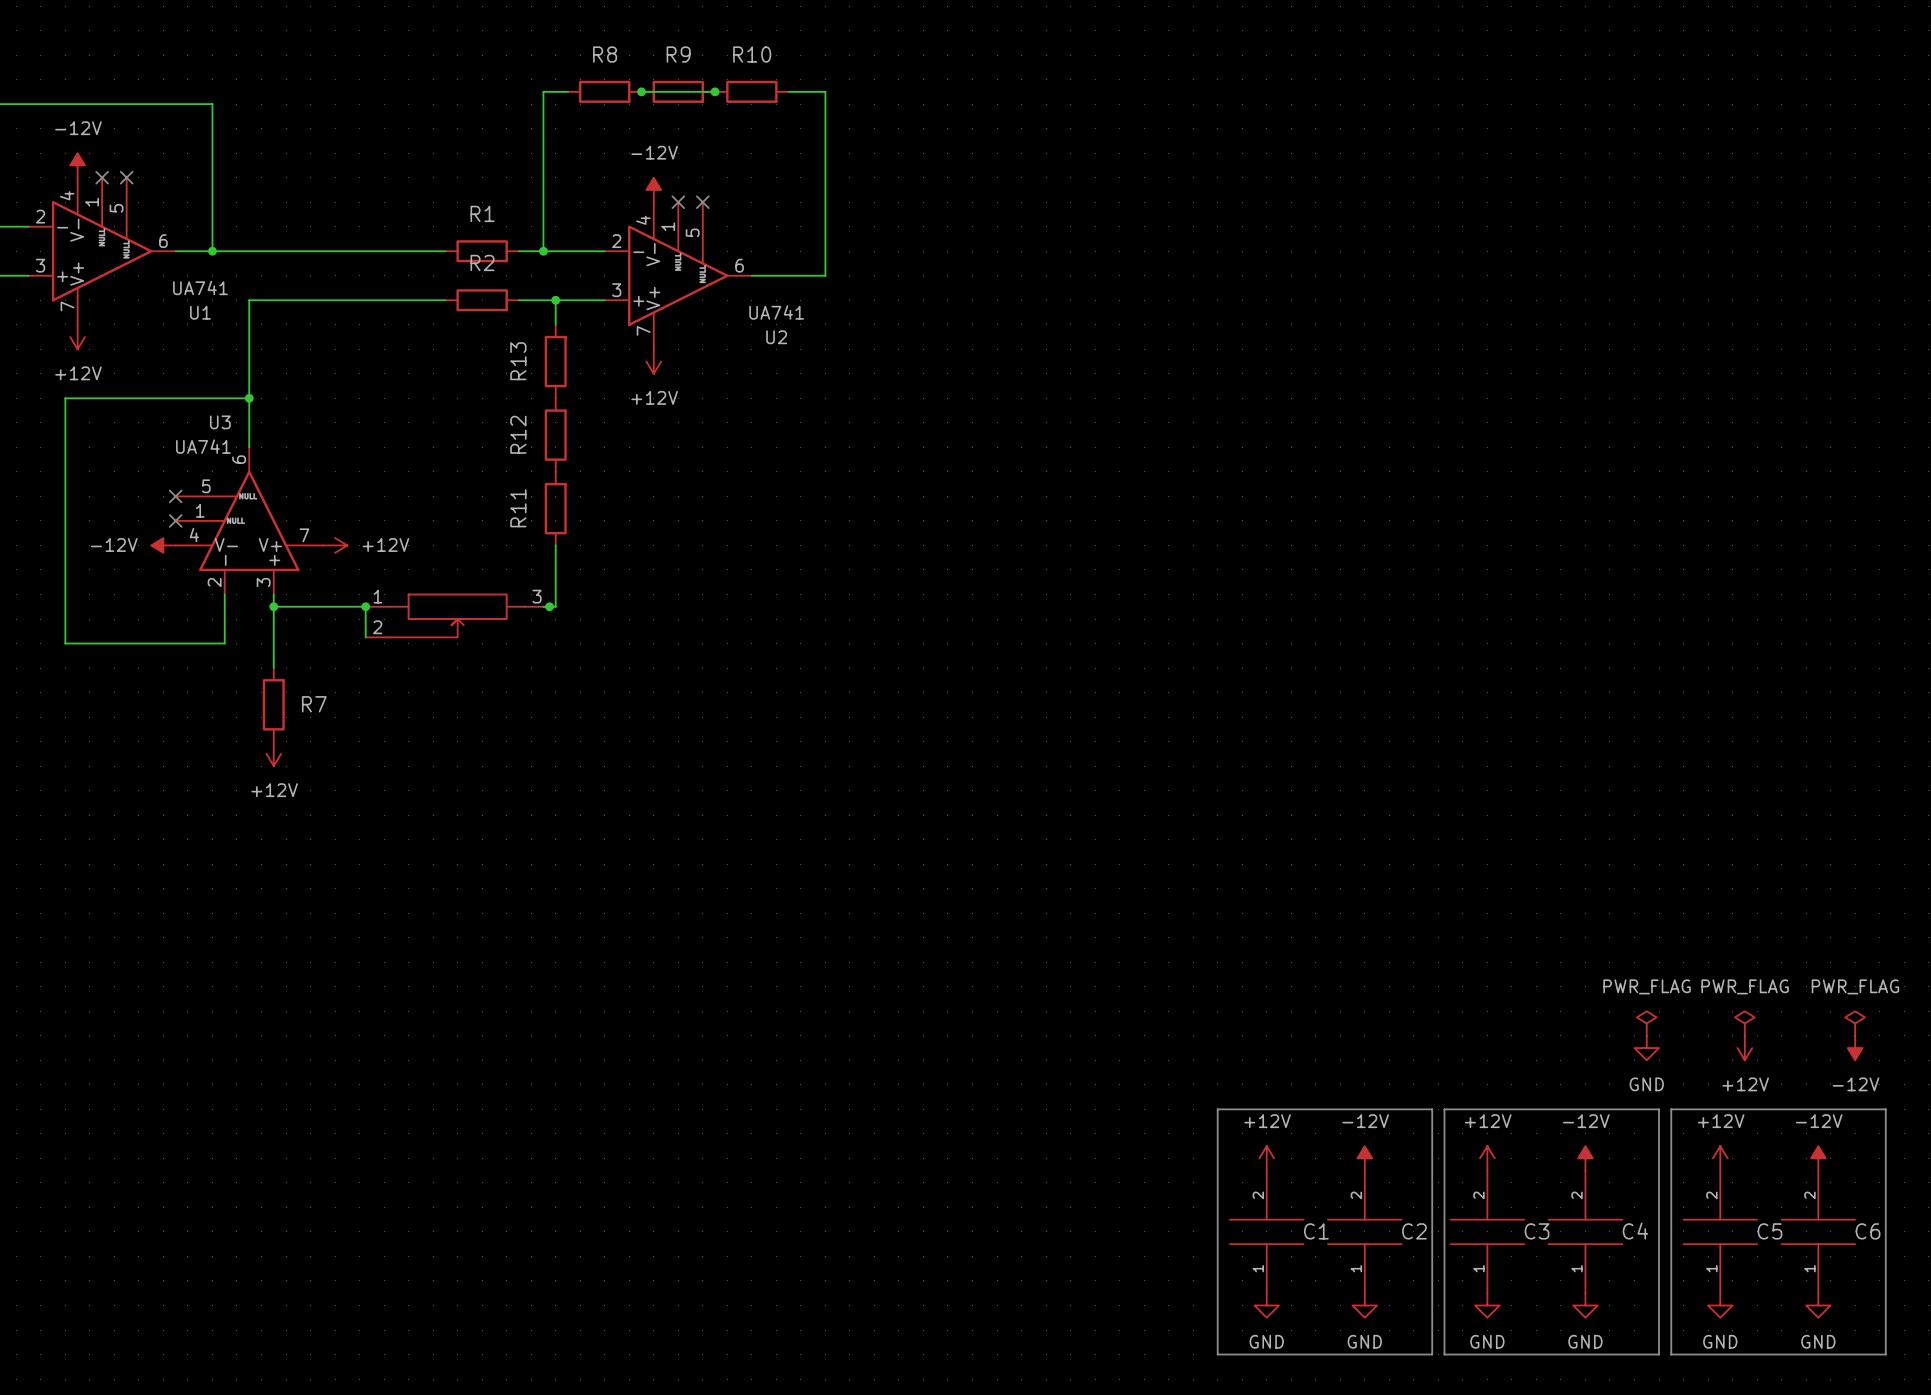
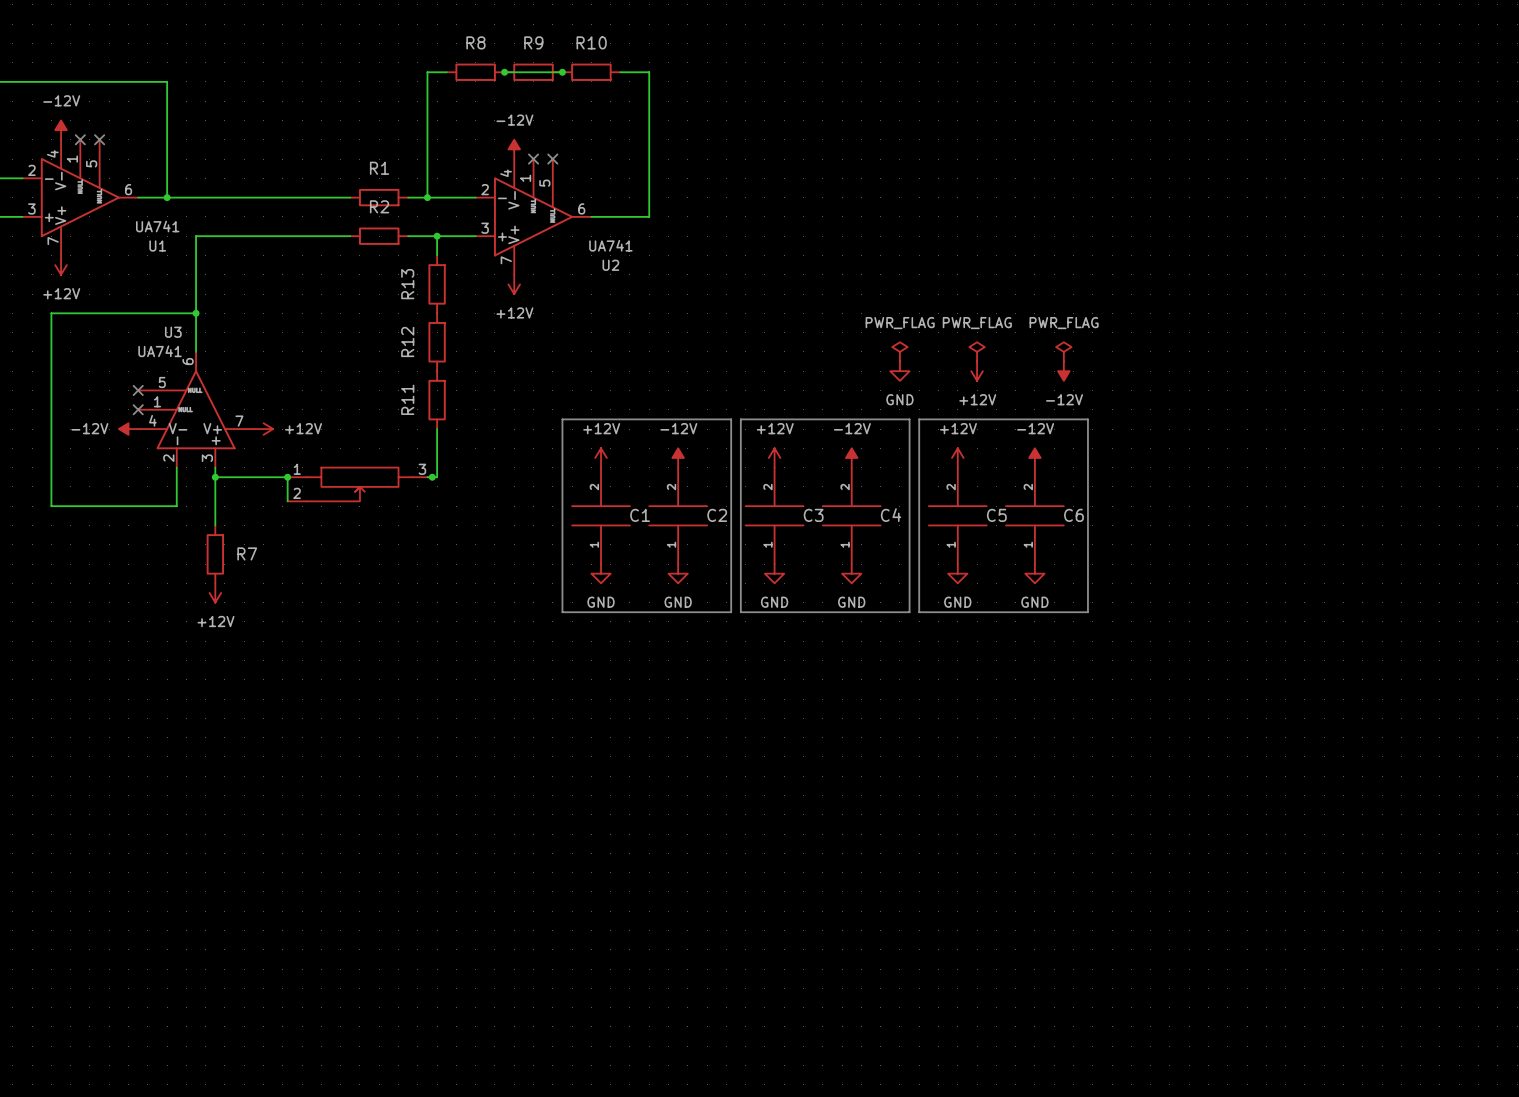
power symbol: none -> PWR_FLAG (899, 351)
power symbol: none -> PWR_FLAG (977, 351)
power symbol: none -> PWR_FLAG (1063, 351)
power symbol: none -> GND (899, 371)
power symbol: none -> +12V (977, 371)
power symbol: none -> -12V (1063, 371)
line: none -> (562, 419) (731, 419) (731, 612) (562, 612) (562, 419)
line: none -> (740, 419) (909, 419) (909, 612) (740, 612) (740, 419)
line: none -> (919, 419) (1087, 419) (1087, 612) (919, 612) (919, 419)
power symbol: none -> +12V (601, 457)
power symbol: none -> -12V (678, 457)
power symbol: none -> +12V (774, 457)
power symbol: none -> -12V (851, 457)
power symbol: none -> +12V (957, 457)
power symbol: none -> -12V (1034, 457)
power symbol: none -> GND (601, 573)
power symbol: none -> GND (678, 573)
power symbol: none -> GND (774, 573)
power symbol: none -> GND (851, 573)
power symbol: none -> GND (957, 573)
power symbol: none -> GND (1034, 573)
power symbol: PWR_FLAG (1646, 1023) -> none
power symbol: PWR_FLAG (1744, 1023) -> none
power symbol: PWR_FLAG (1855, 1023) -> none
power symbol: GND (1646, 1048) -> none
power symbol: +12V (1744, 1048) -> none
power symbol: -12V (1855, 1048) -> none
line: (1217, 1109) (1432, 1109) (1432, 1354) (1217, 1354) (1217, 1109) -> none
line: (1444, 1109) (1659, 1109) (1659, 1354) (1444, 1354) (1444, 1109) -> none
line: (1671, 1109) (1885, 1109) (1885, 1354) (1671, 1354) (1671, 1109) -> none
power symbol: +12V (1266, 1158) -> none
power symbol: -12V (1364, 1158) -> none
power symbol: +12V (1487, 1158) -> none
power symbol: -12V (1585, 1158) -> none
power symbol: +12V (1720, 1158) -> none
power symbol: -12V (1818, 1158) -> none
C1 position: (1266, 1231) -> (601, 515)
C2 position: (1364, 1231) -> (678, 515)
C3 position: (1487, 1231) -> (774, 515)
C4 position: (1585, 1231) -> (851, 515)
C5 position: (1720, 1231) -> (957, 515)
C6 position: (1818, 1231) -> (1034, 515)
power symbol: GND (1266, 1305) -> none
power symbol: GND (1364, 1305) -> none
power symbol: GND (1487, 1305) -> none
power symbol: GND (1585, 1305) -> none
power symbol: GND (1720, 1305) -> none
power symbol: GND (1818, 1305) -> none

